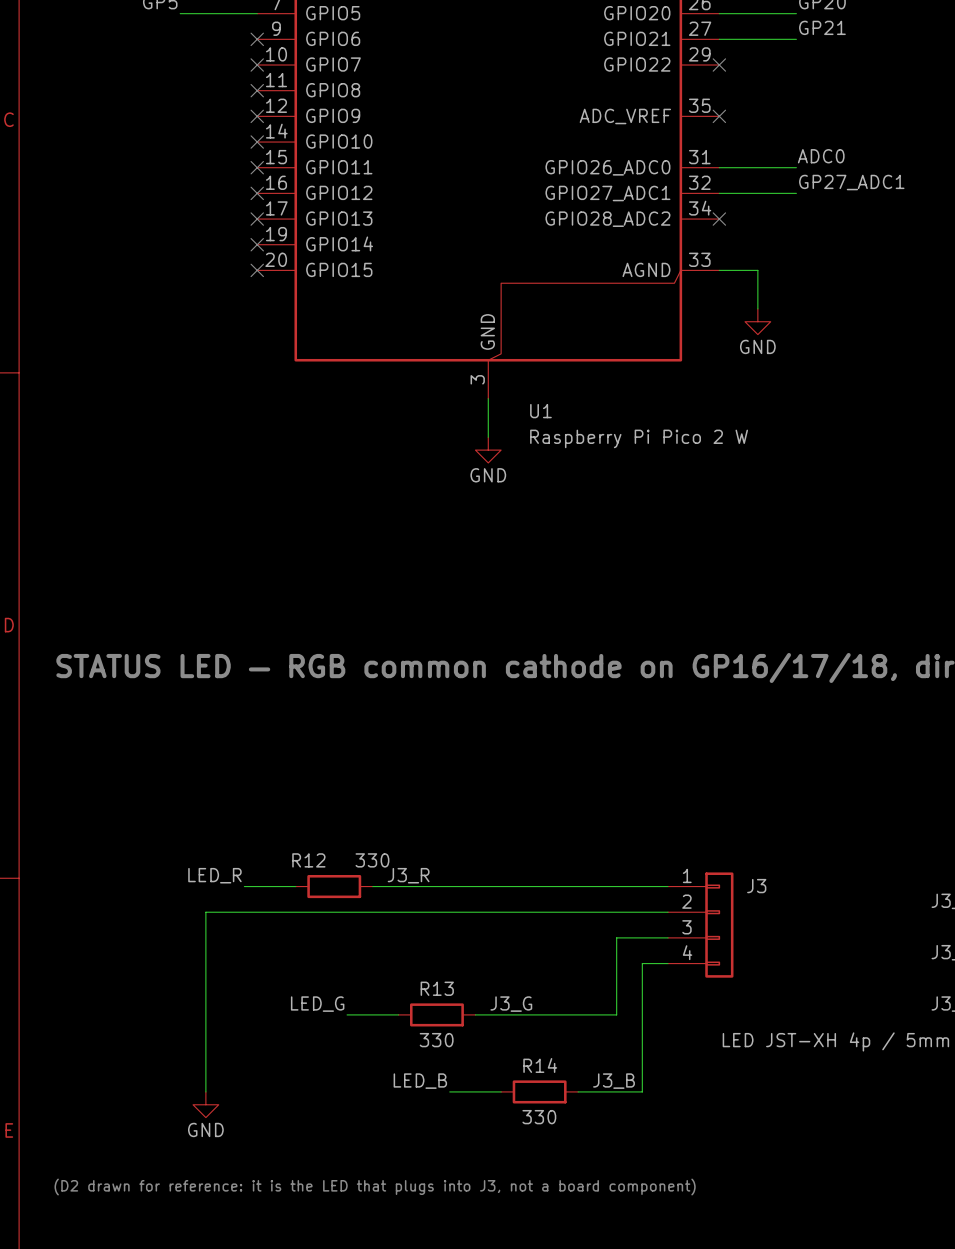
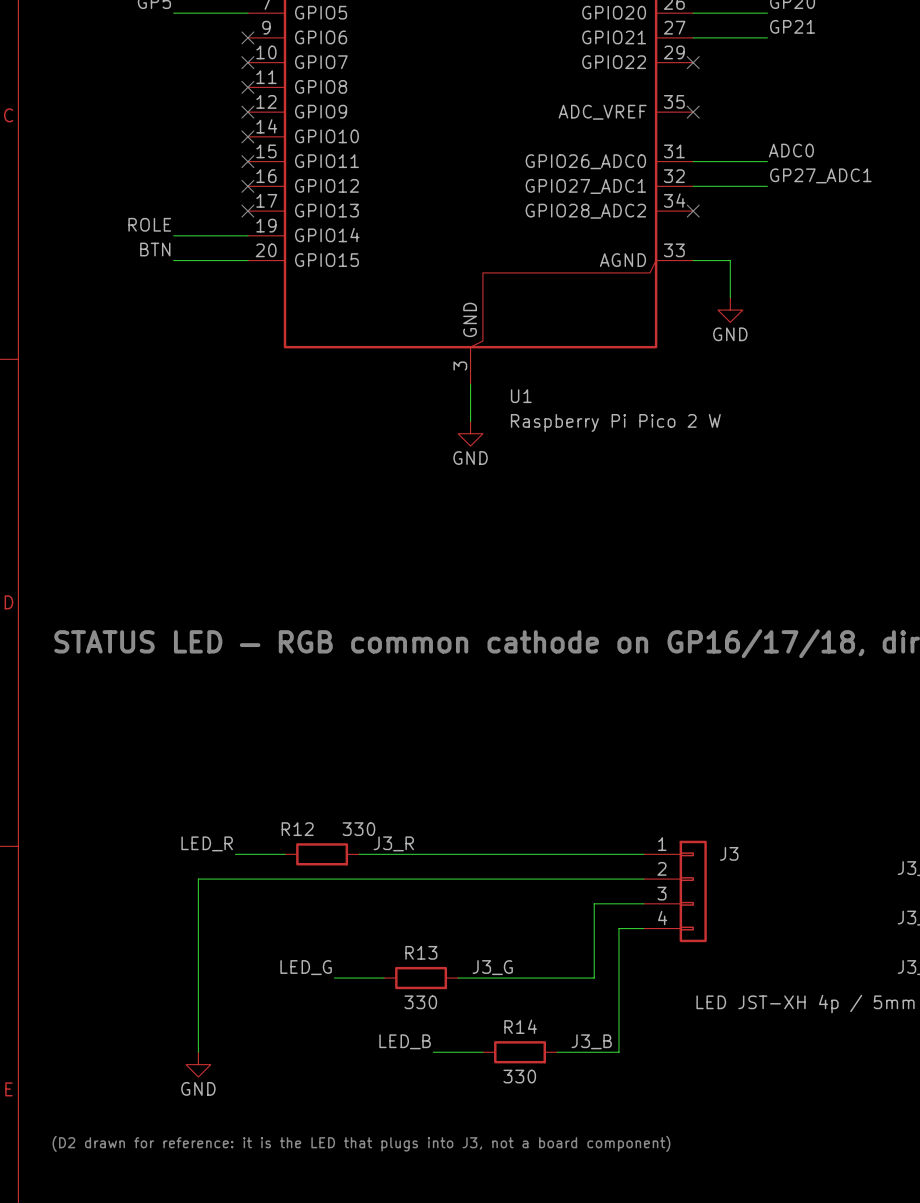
label: none -> ROLE (149, 224)
wire: none -> (173, 235) (247, 235)
no-connect mark: (257, 244) -> none
label: none -> BTN (155, 249)
wire: none -> (173, 260) (247, 260)
no-connect mark: (257, 270) -> none

